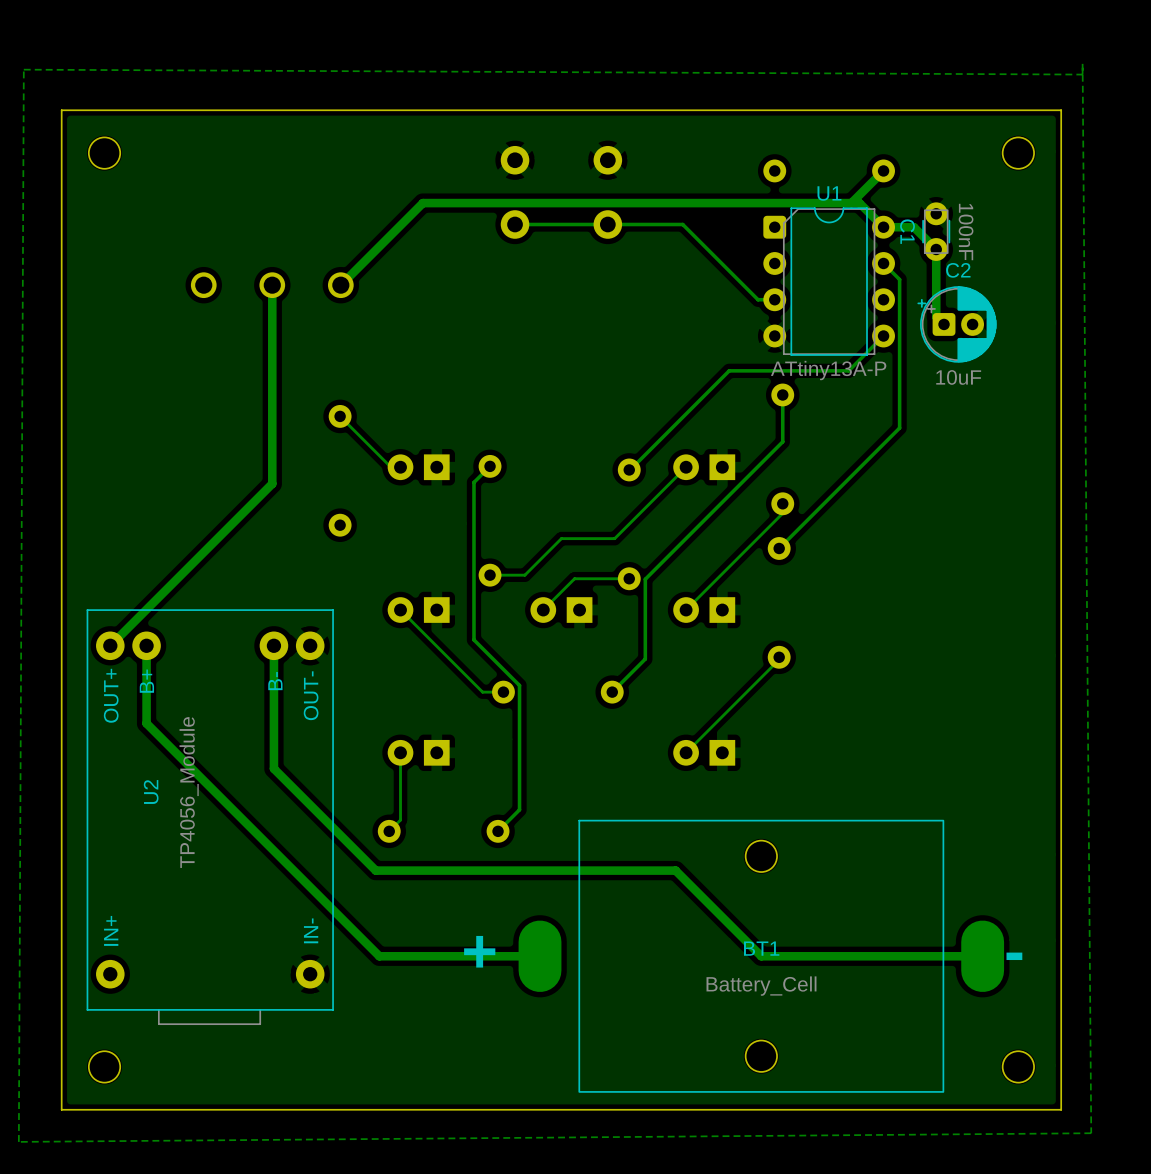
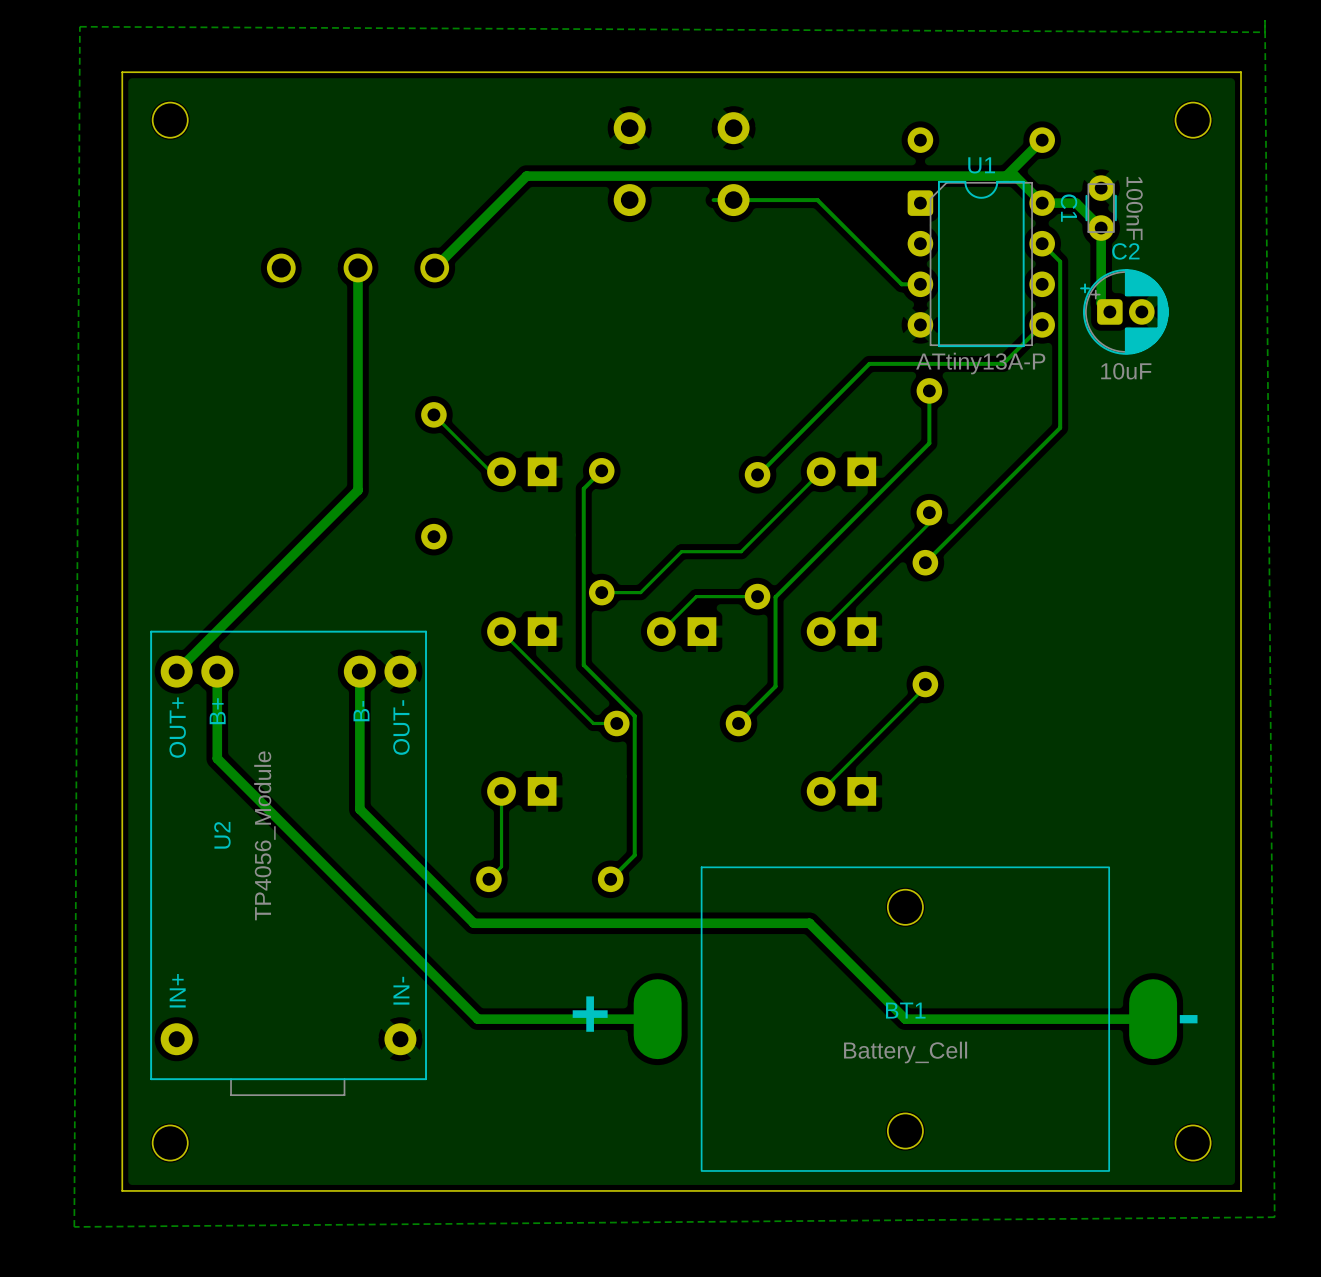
track: (589, 224) (515, 224) -> none

